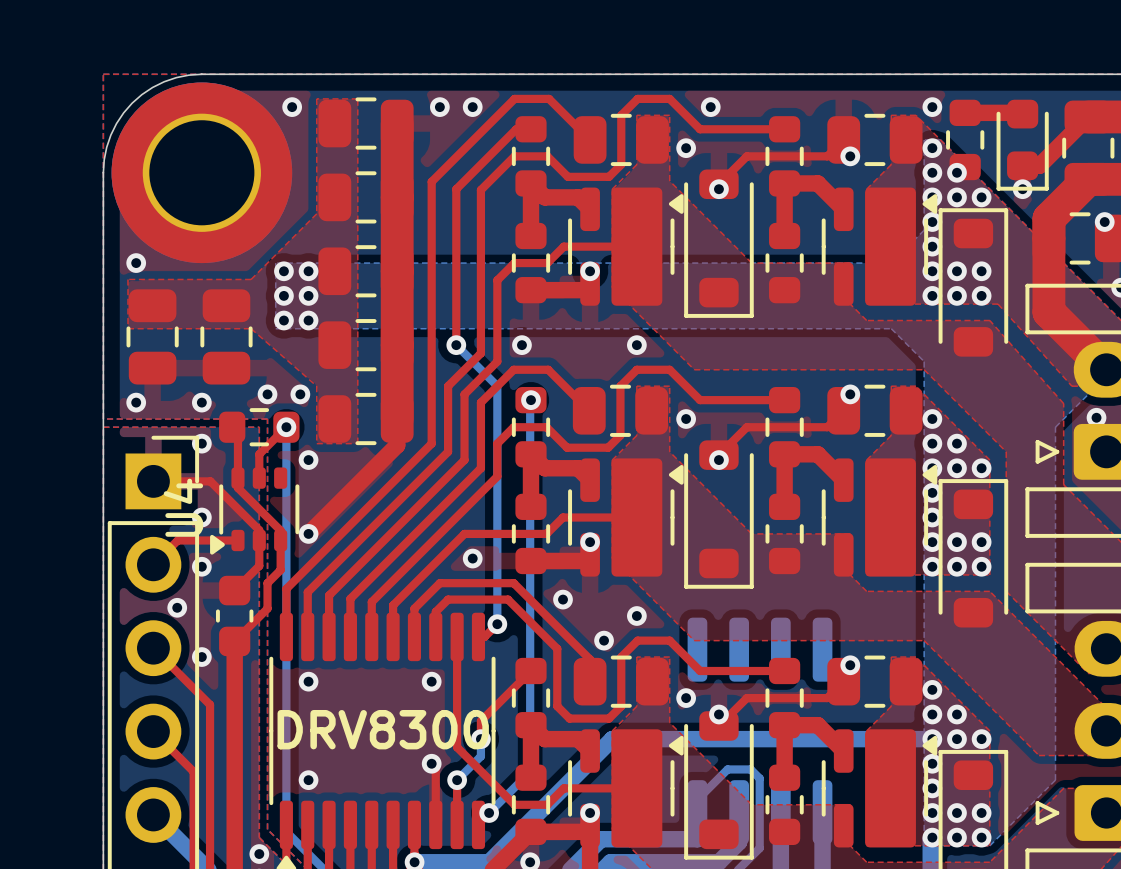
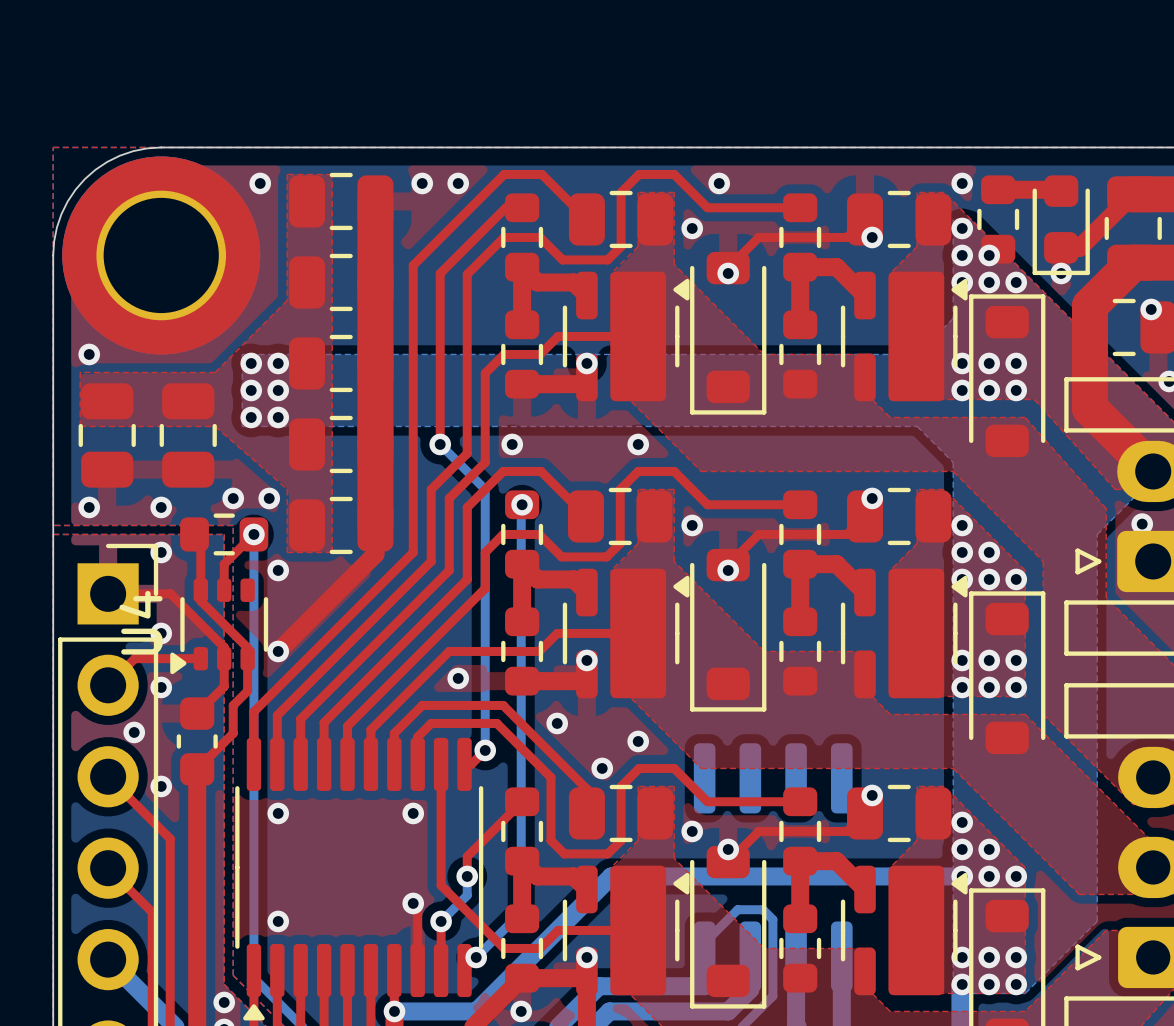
via: (932, 222) -> none
via: (932, 246) -> none
via: (932, 492) -> none
via: (932, 517) -> none
text: DRV8300 (383, 729) -> none
via: (932, 763) -> none
via: (932, 788) -> none

